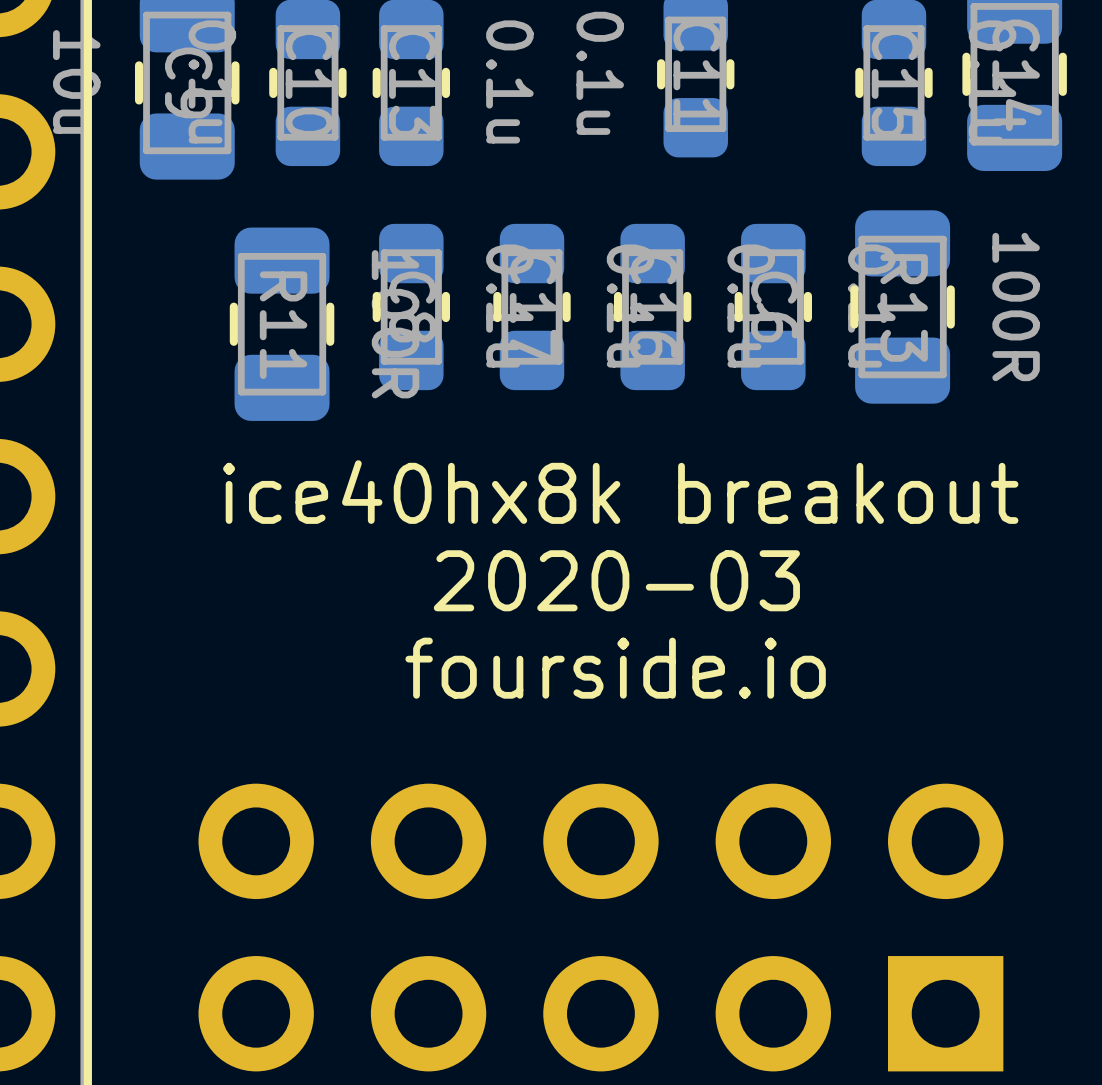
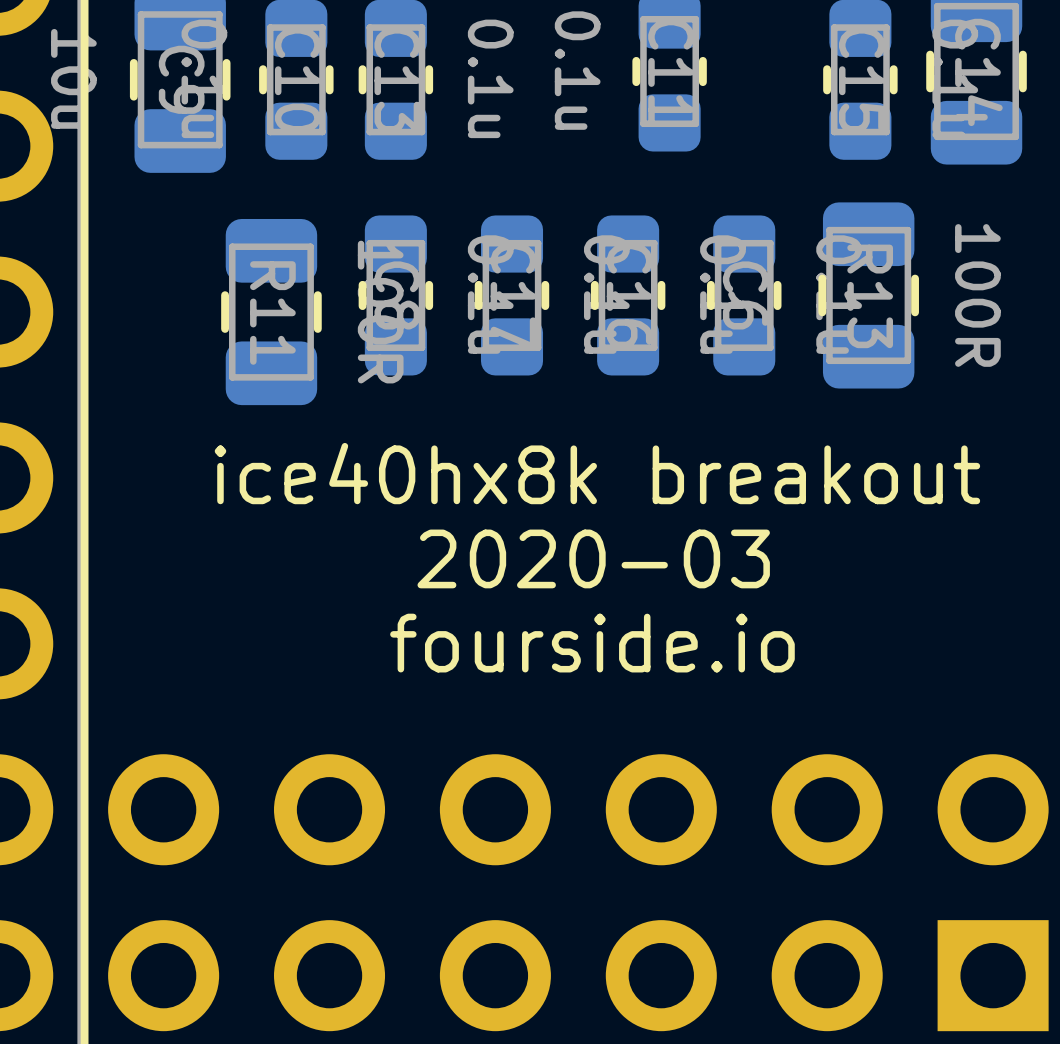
part footprint: [198, 783, 1004, 1072] -> [108, 754, 1049, 1032]

